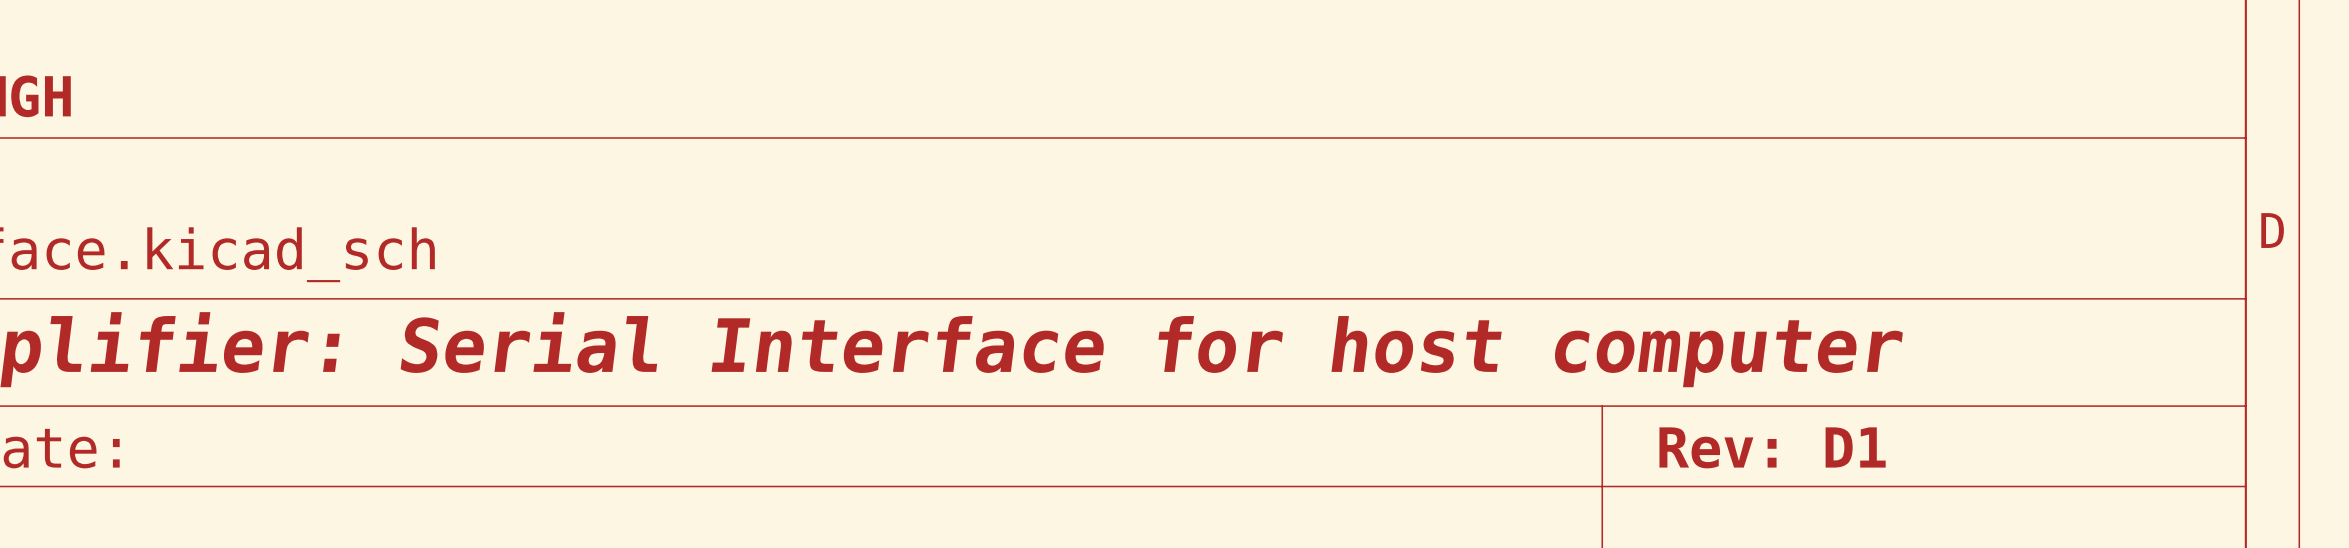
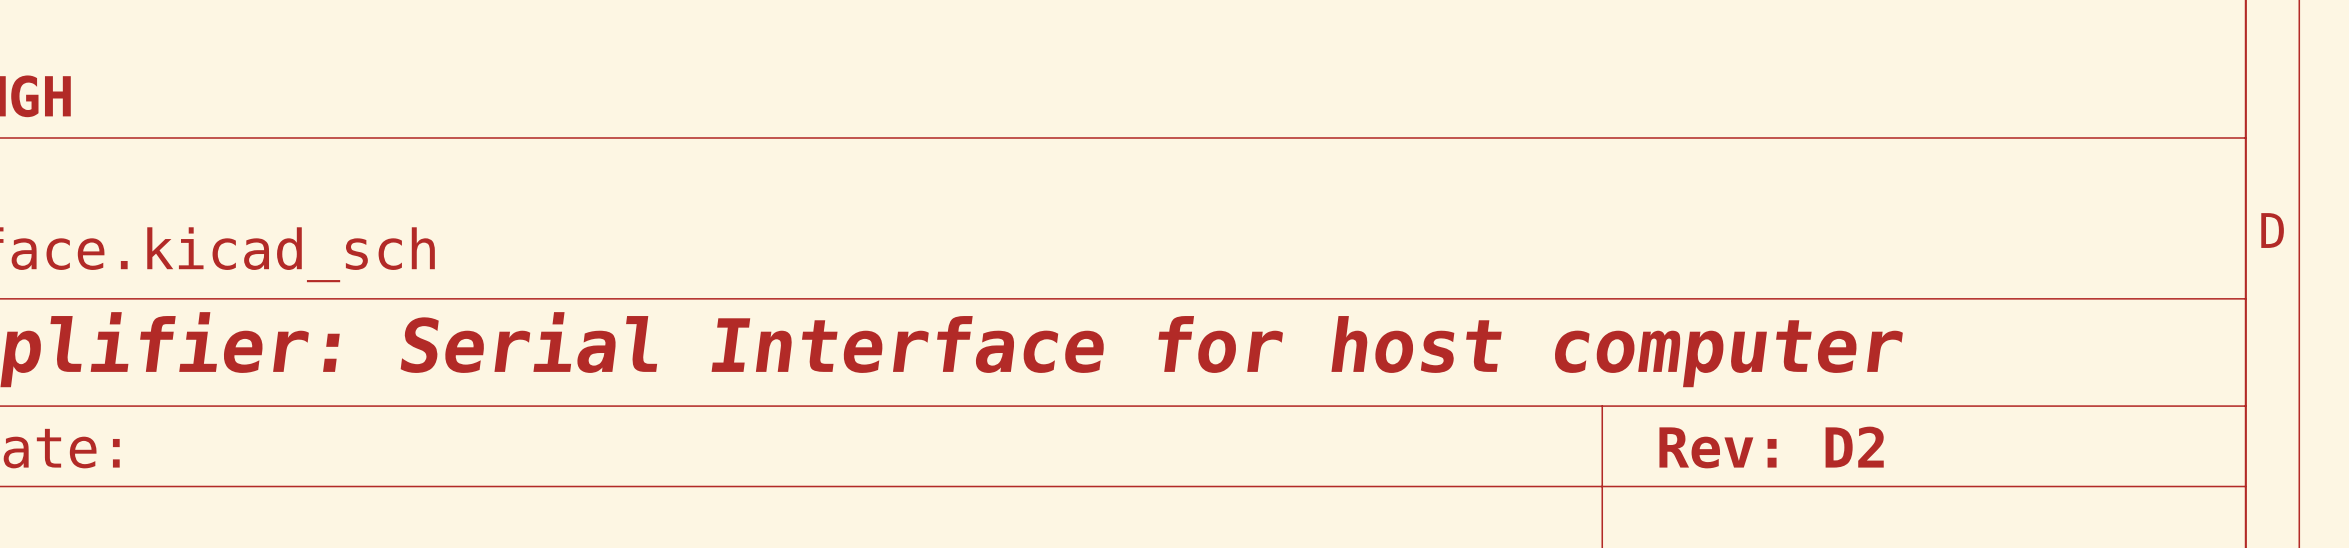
title block: Rev: D1 (1772, 447) -> Rev: D2 (1771, 447)

